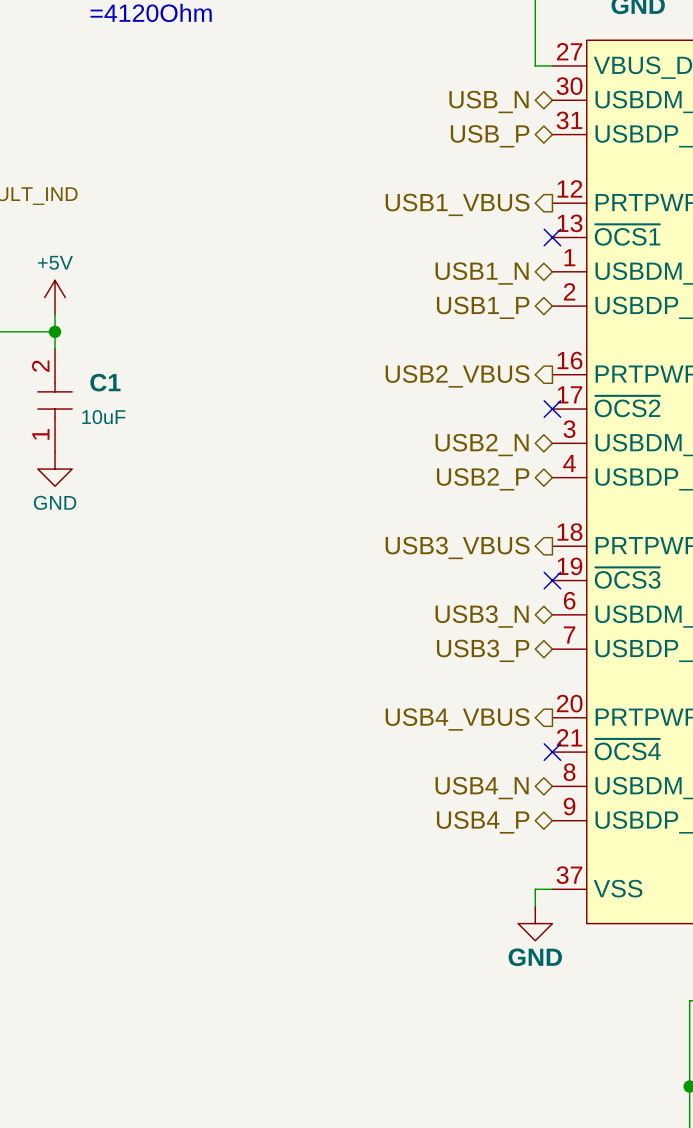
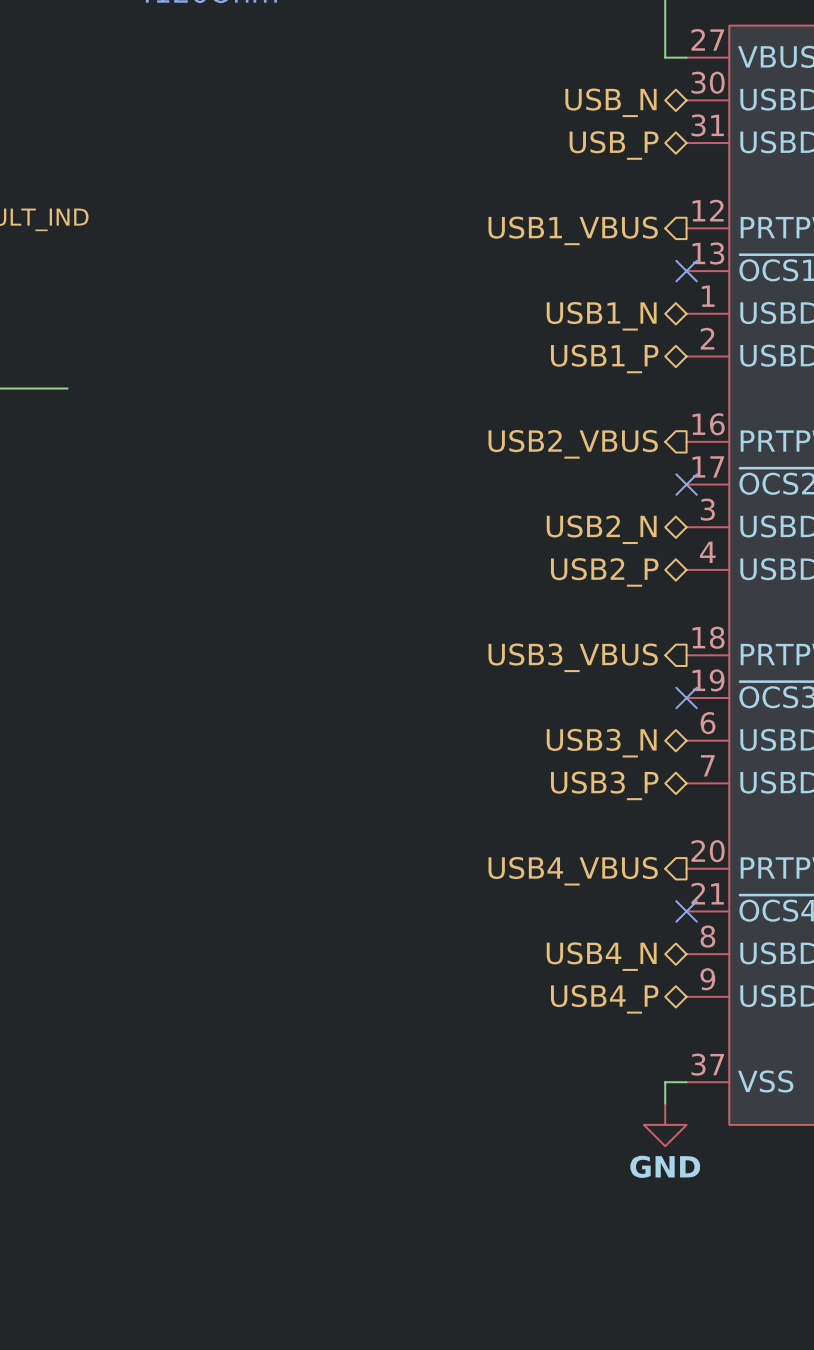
power symbol: +5V (55, 297) -> none
wire: (55, 314) (55, 348) -> none
junction: (55, 331) -> none
C1: 10uF (55, 400) -> none
power symbol: GND (55, 469) -> none

